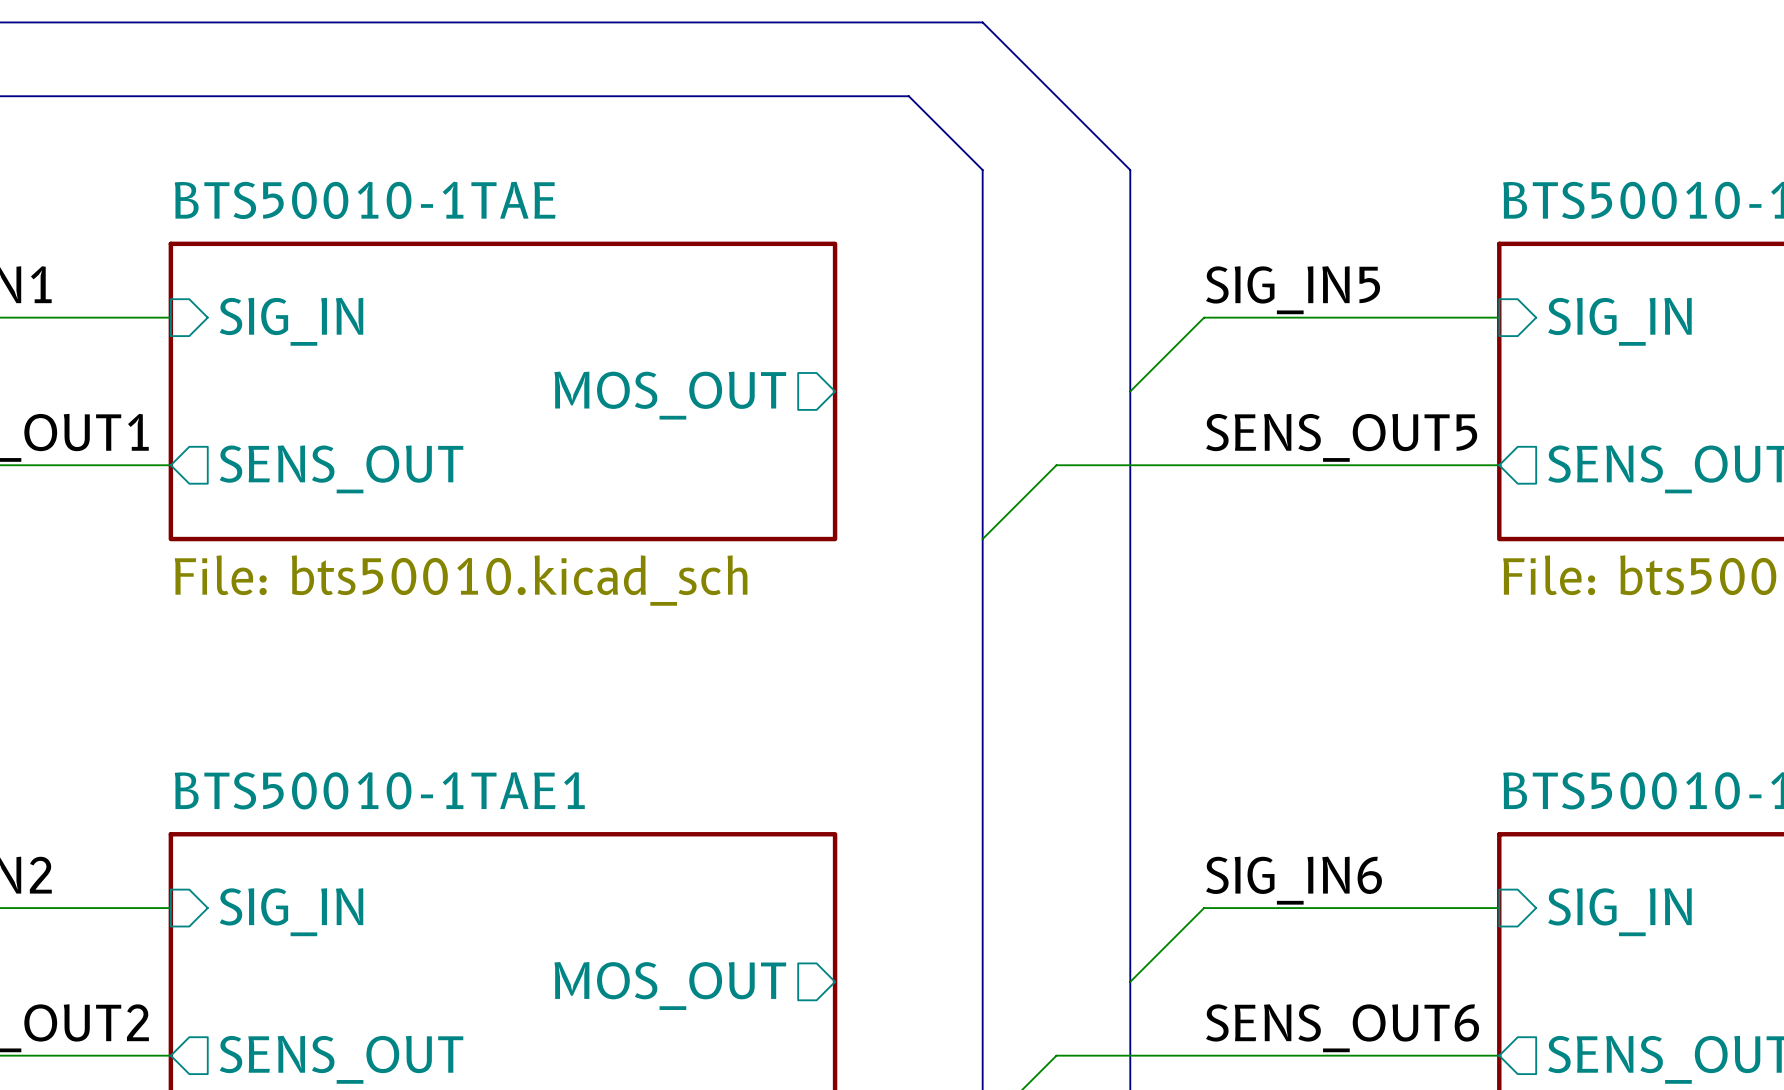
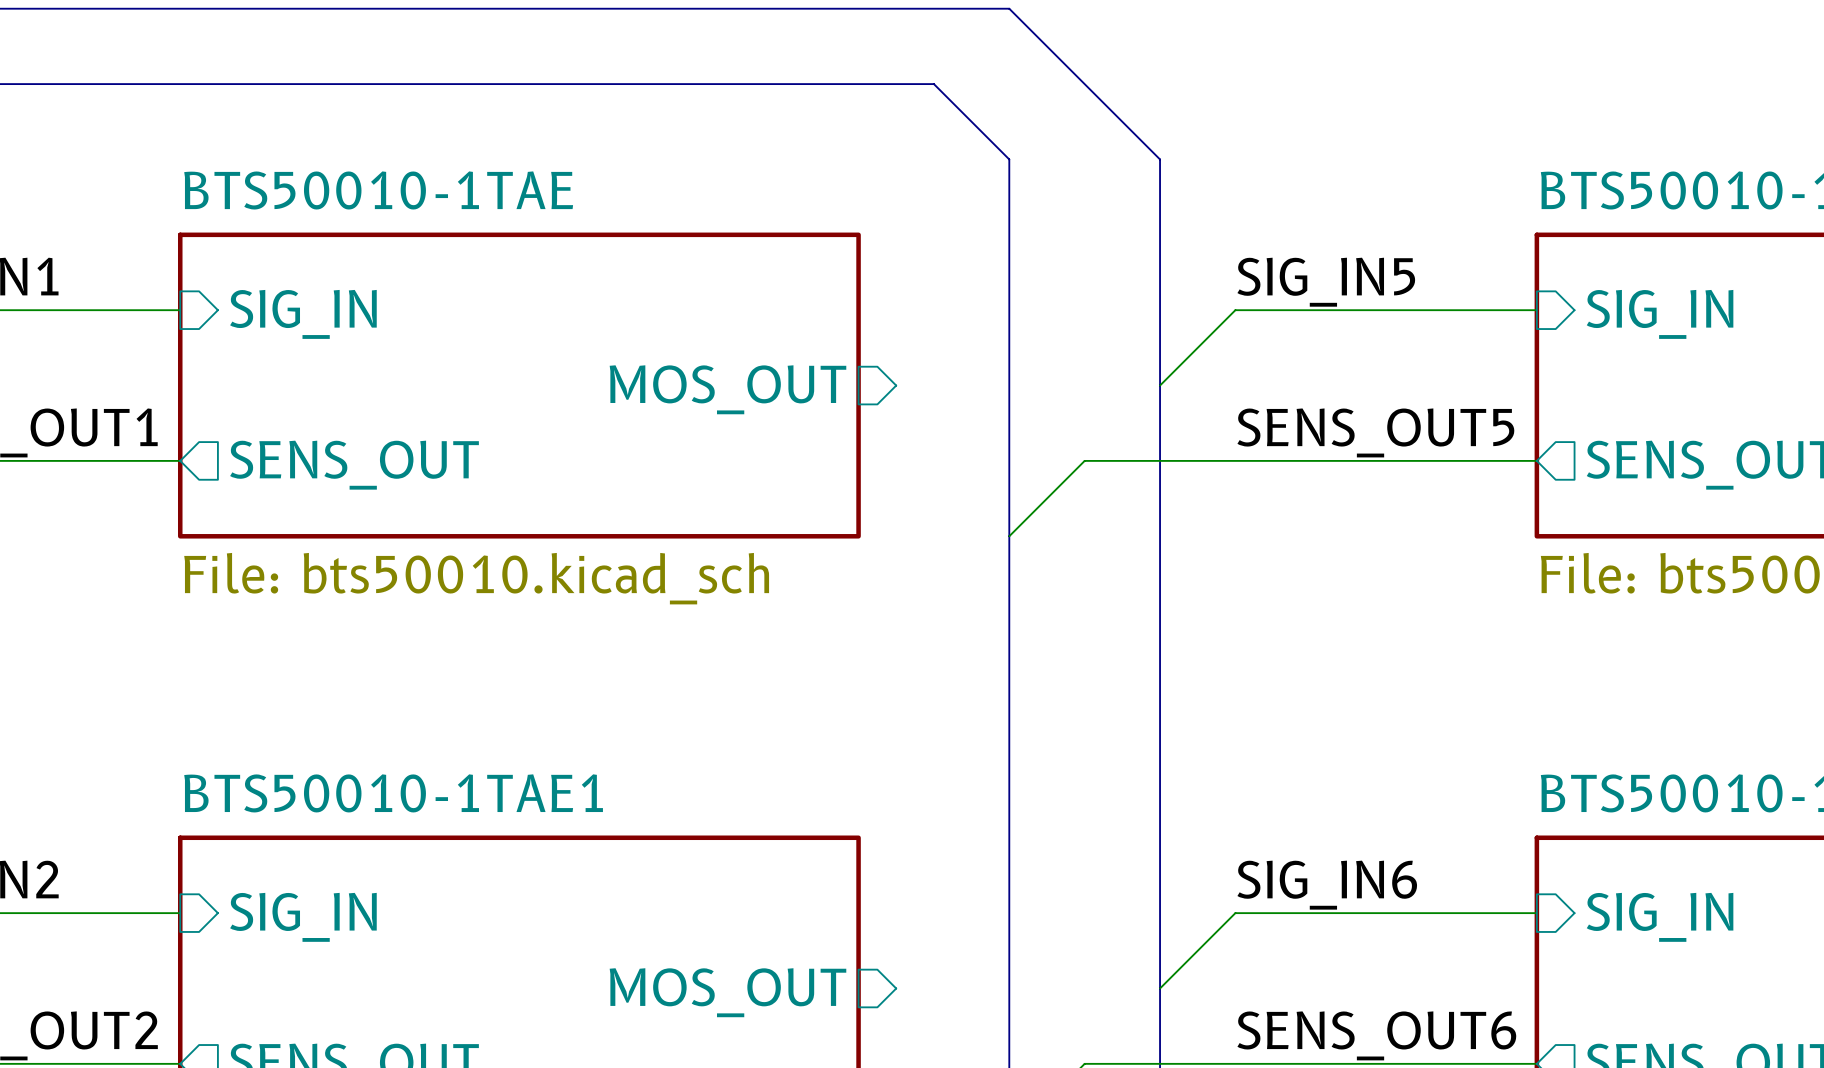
sheet pin position: MOS_OUT (670, 395) -> MOS_OUT (727, 389)
sheet pin position: MOS_OUT (670, 986) -> MOS_OUT (727, 992)

